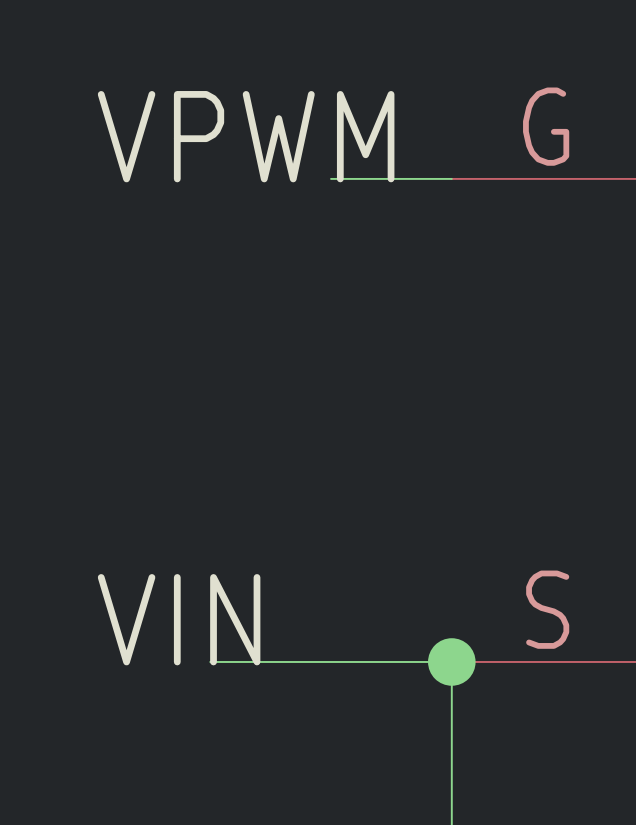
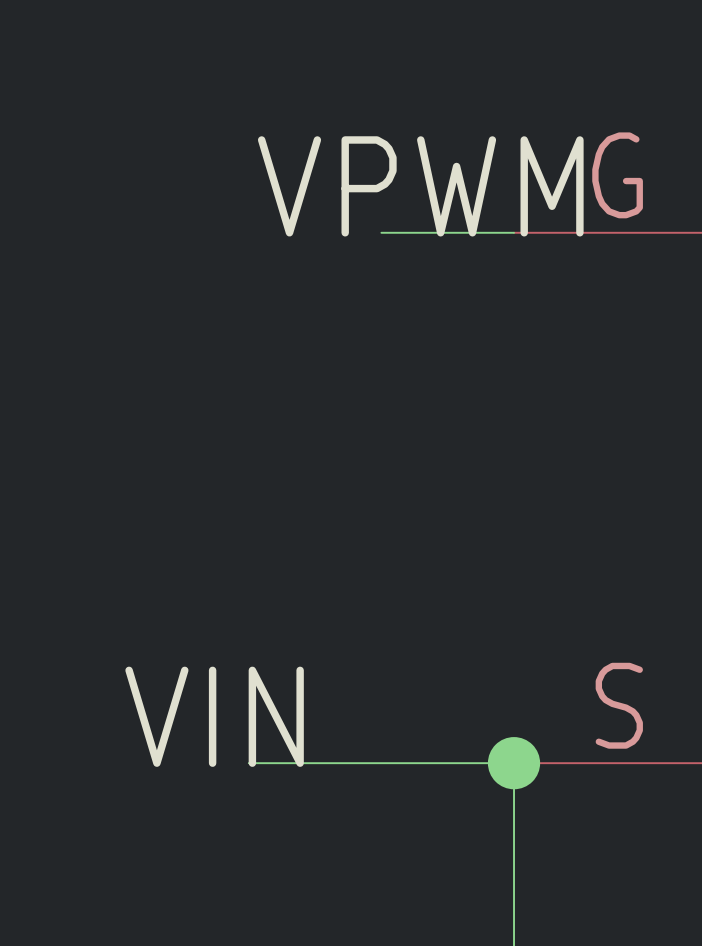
label position: VPWM (246, 136) -> VPWM (420, 186)

